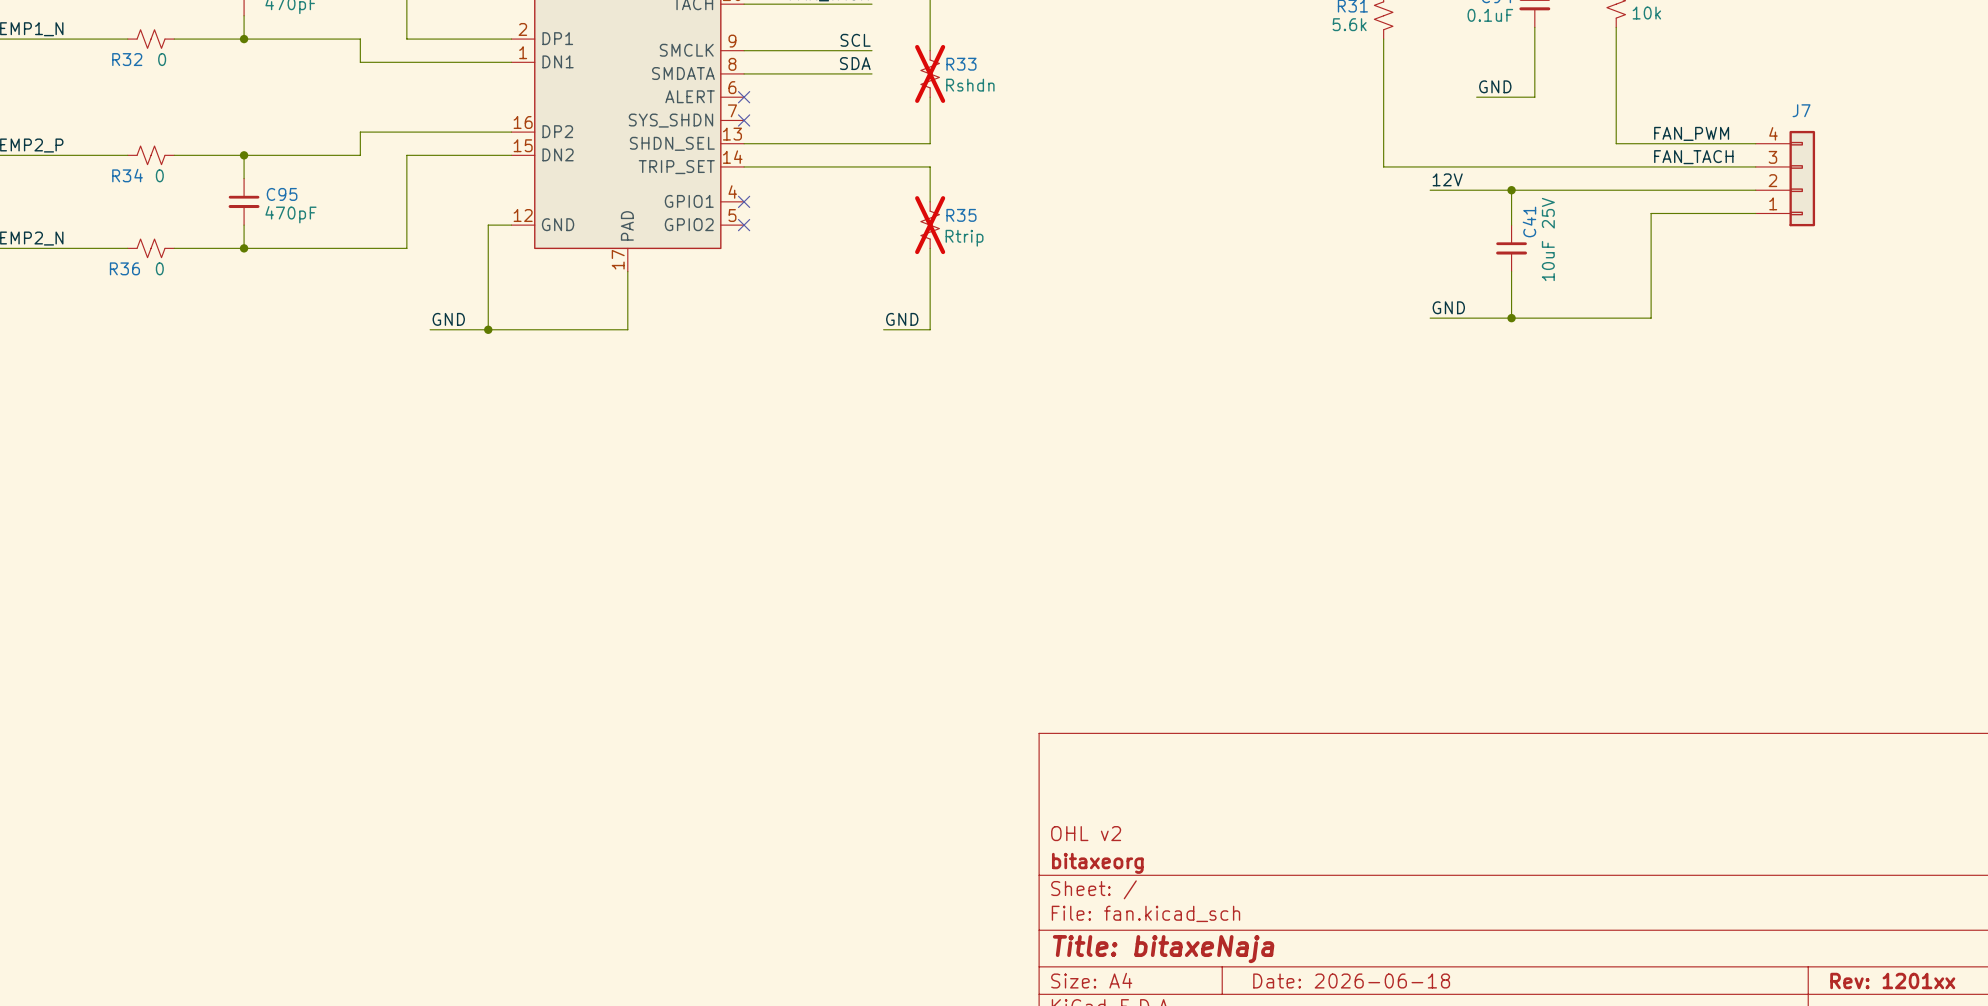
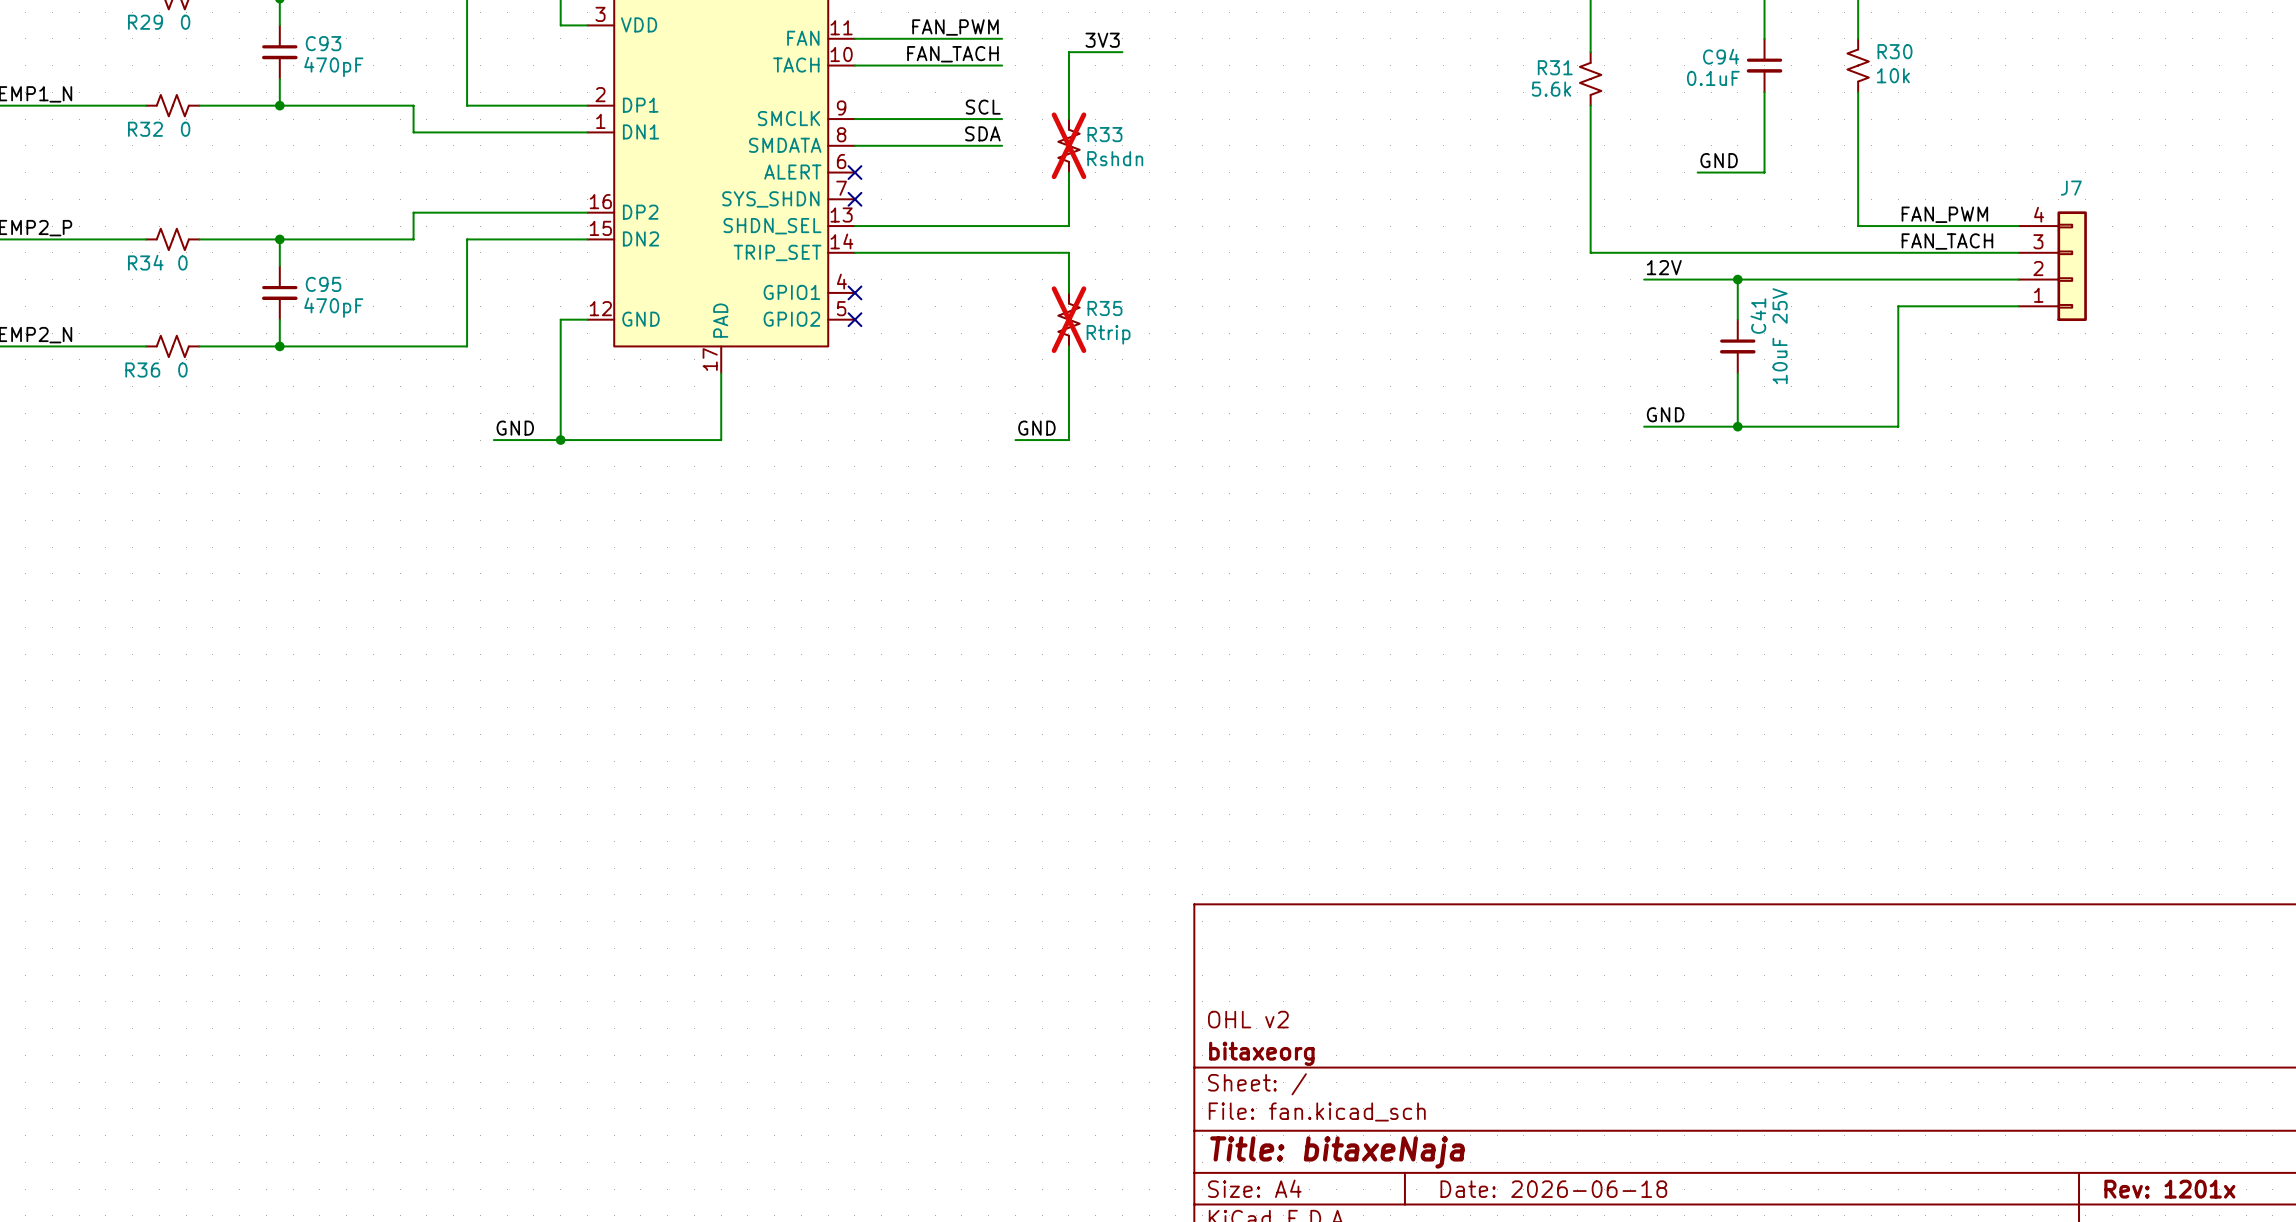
title block: Rev: 1201xx (1892, 981) -> Rev: 1201x (2169, 1189)

